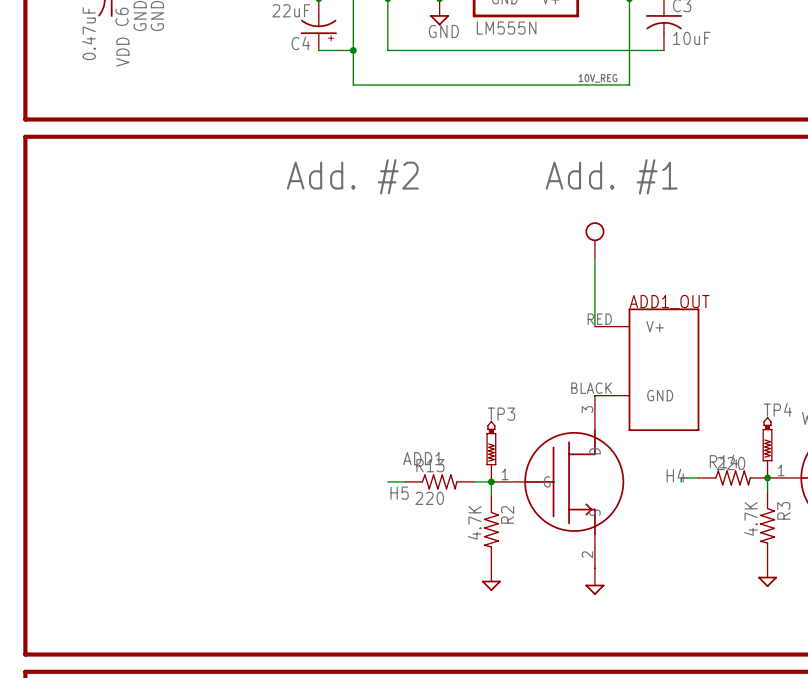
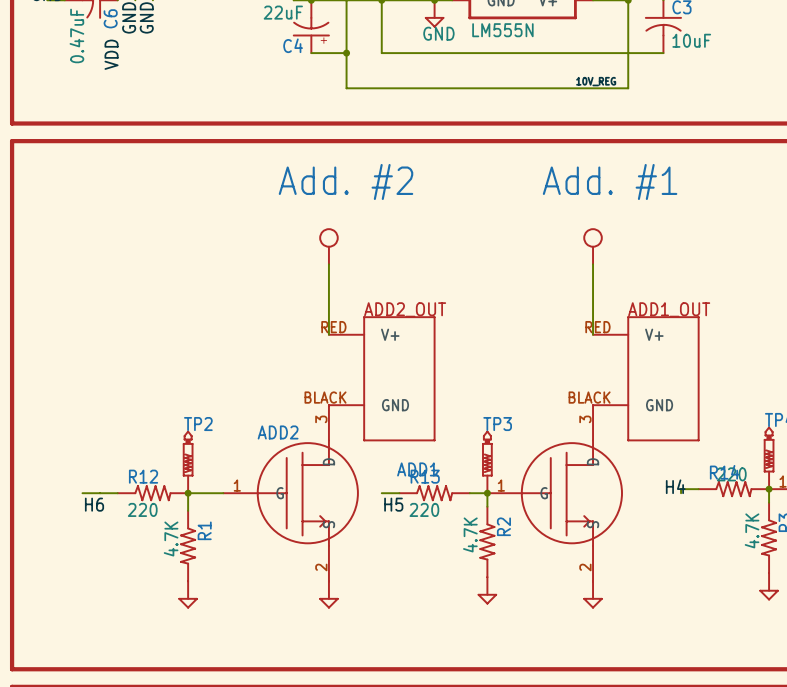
power symbol: none -> (328, 246)
wire: none -> (328, 264) (328, 334)
ADD2_OUT: none -> (382, 378)
TP2: none -> (188, 462)
wire: none -> (82, 493) (117, 493)
R12: none -> 220 (152, 493)
junction: none -> (188, 493)
wire: none -> (223, 493) (188, 493) (188, 510)
ADD2: none -> (291, 493)
label: none -> H6 (94, 504)
R1: none -> 4.7K (188, 546)
power symbol: none -> (188, 594)
power symbol: none -> (328, 594)

